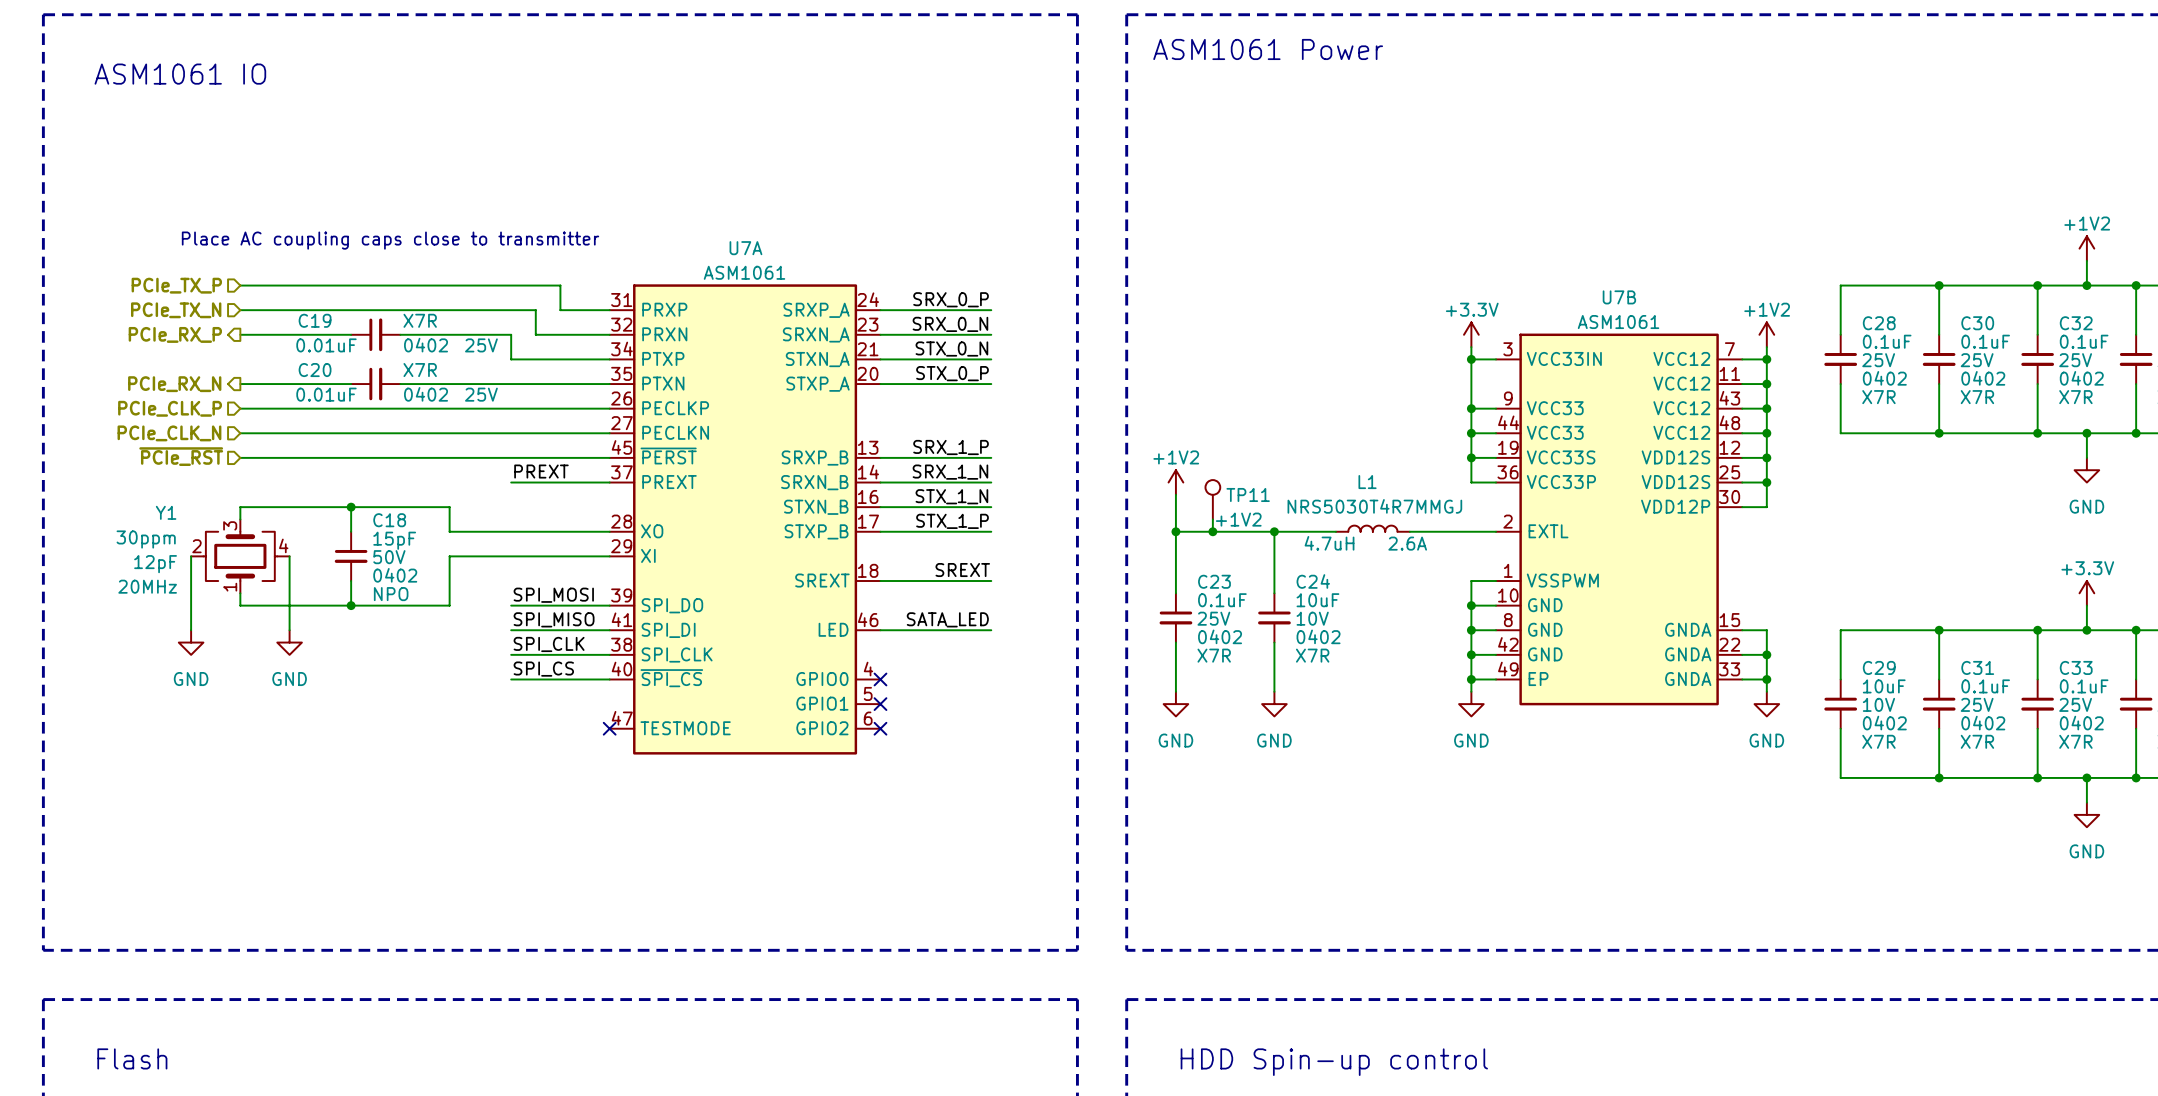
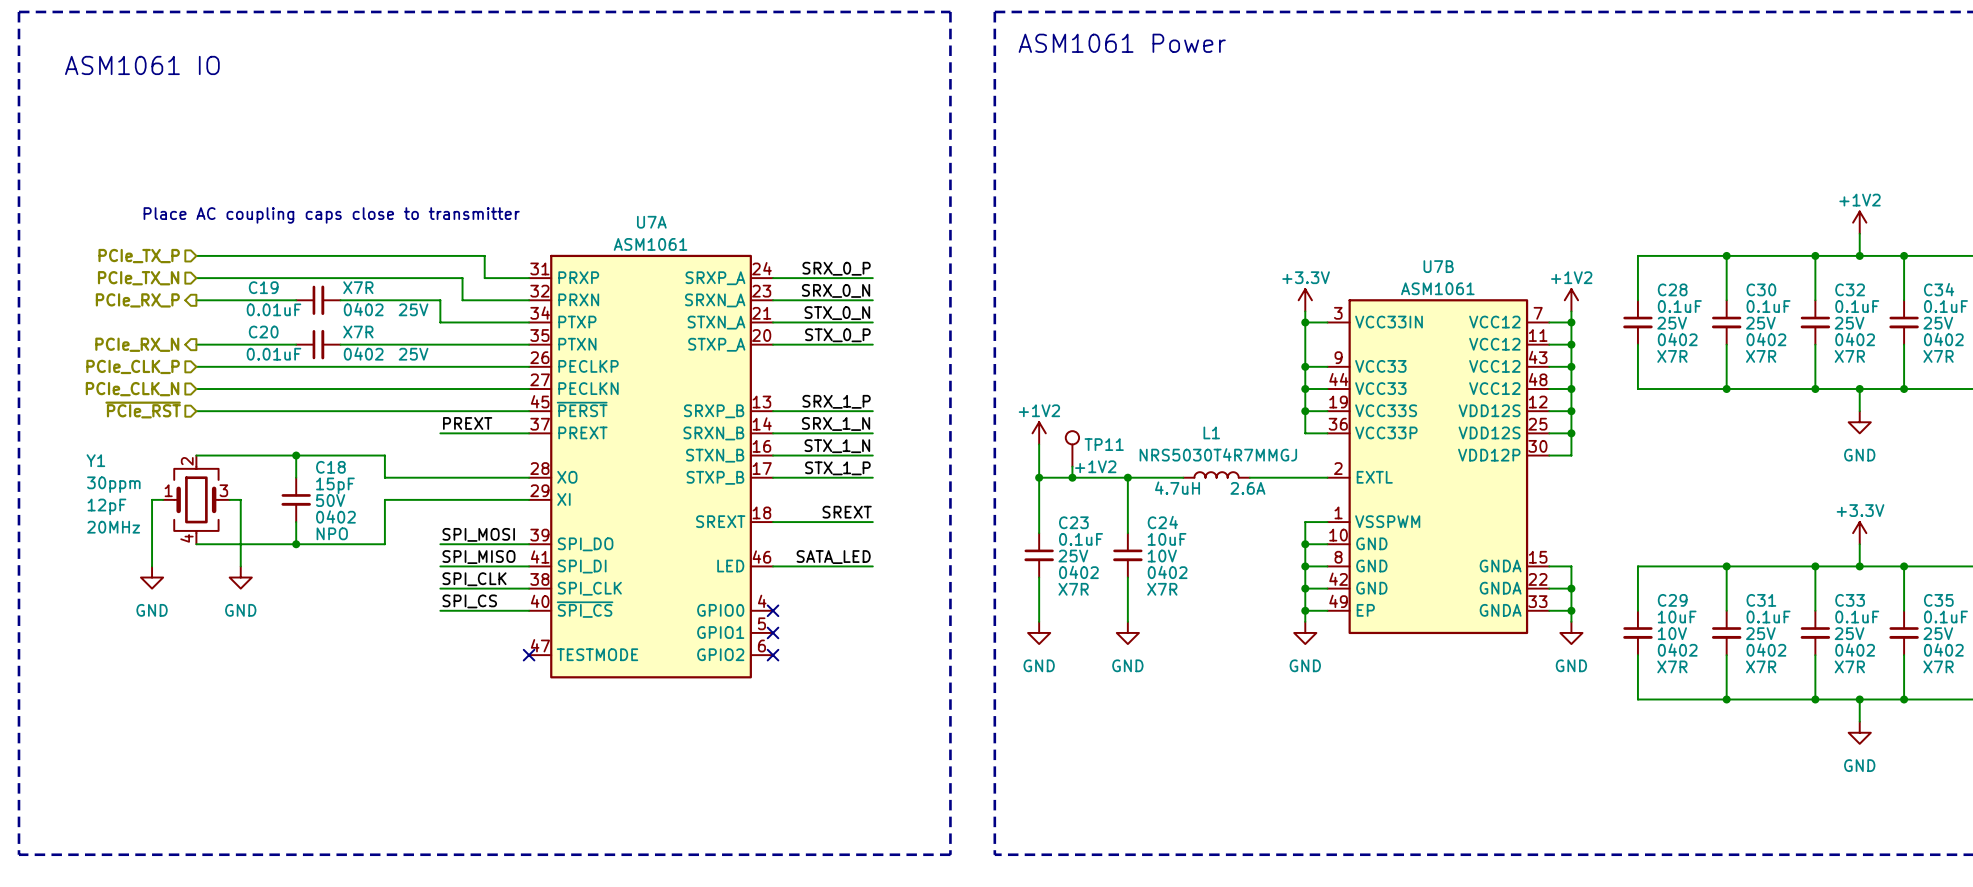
Y1 name position: Y1 (166, 512) -> Y1 (95, 460)
Y1 rotation: 0° (240, 556) -> 90° clockwise (196, 499)

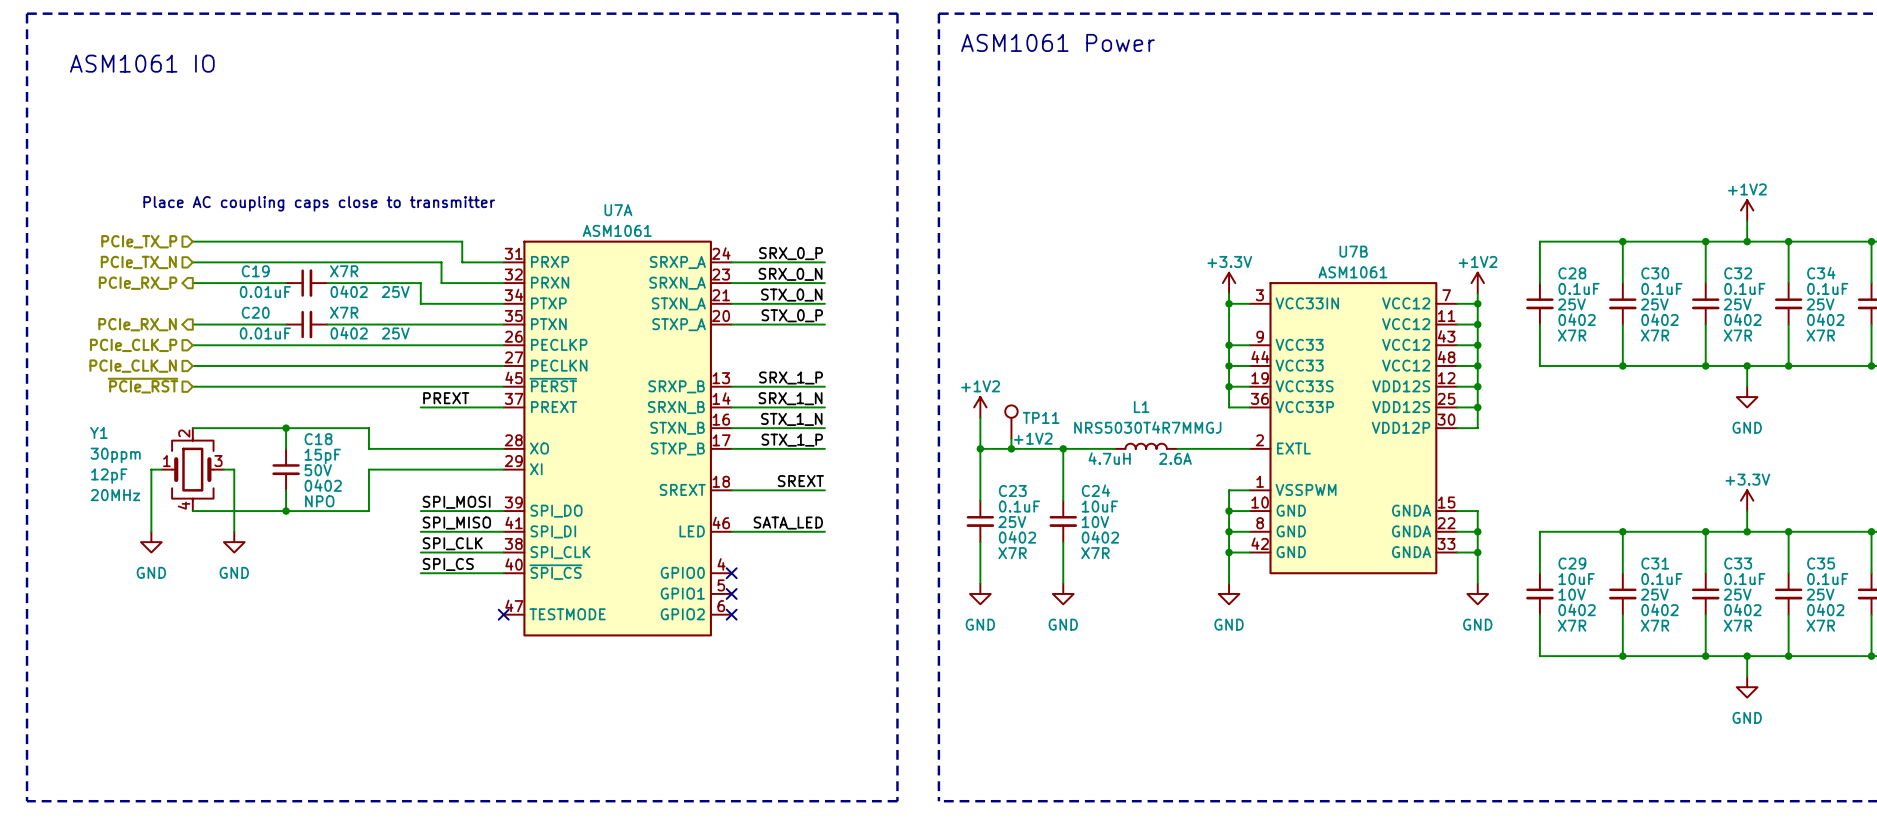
U7B symbol: [1327, 299, 1550, 635] -> [1249, 282, 1458, 575]
wire: none -> (1457, 511) (1477, 511) (1477, 531)
wire: (1305, 610) (1327, 610) -> none
junction: (1305, 610) -> none
wire: (1549, 610) (1571, 610) -> none
junction position: (1571, 610) -> (1477, 531)

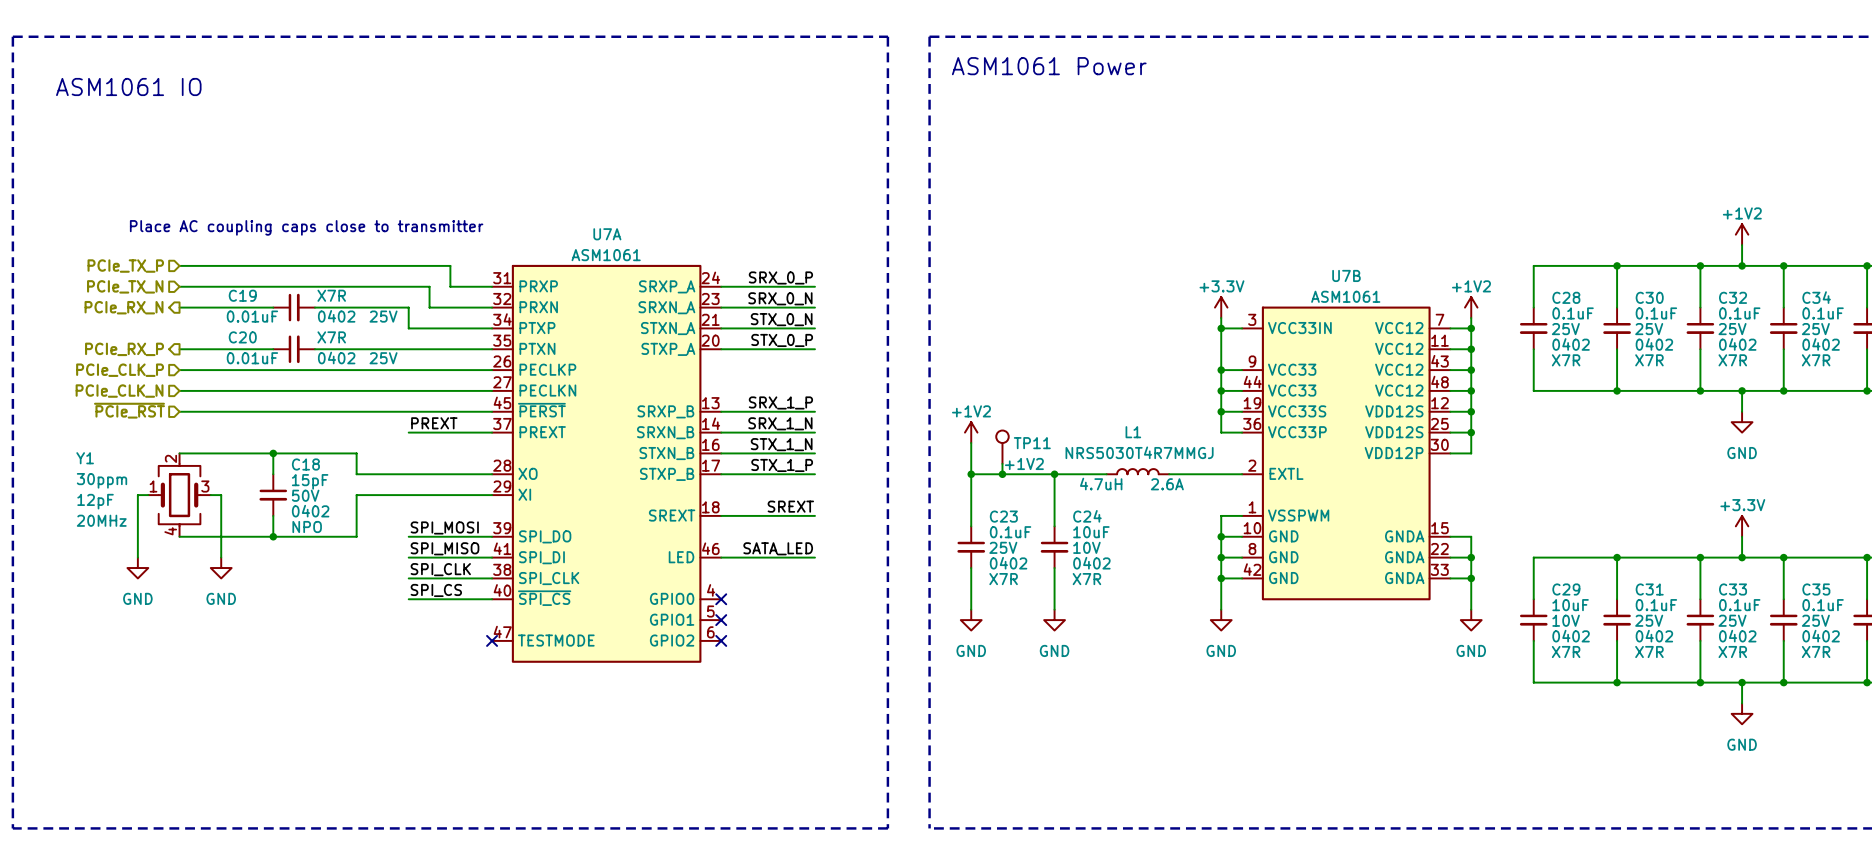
hierarchical label: PCIe_RX_P (138, 283) -> PCIe_RX_N (124, 307)
hierarchical label: PCIe_RX_N (137, 324) -> PCIe_RX_P (124, 349)

